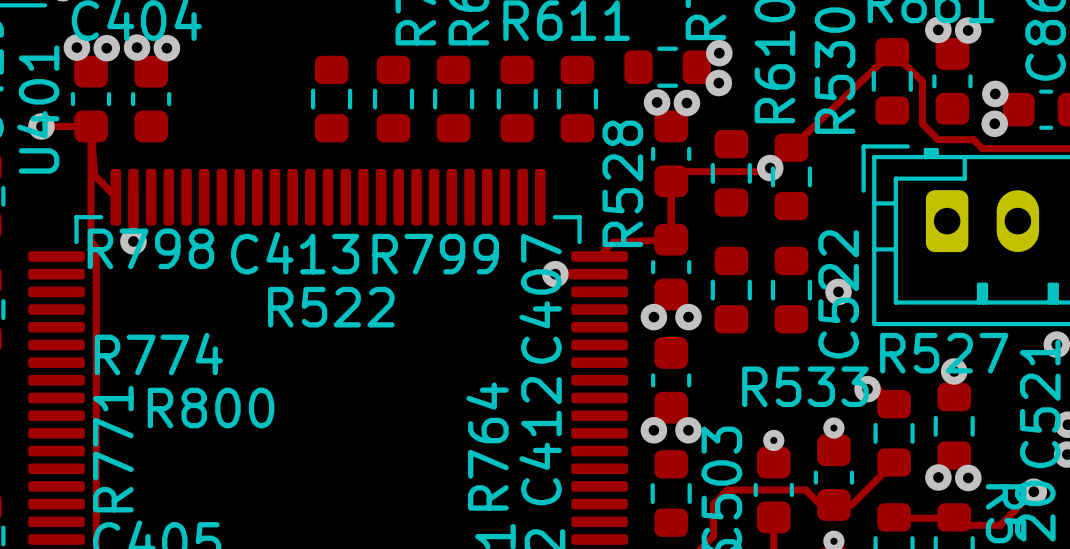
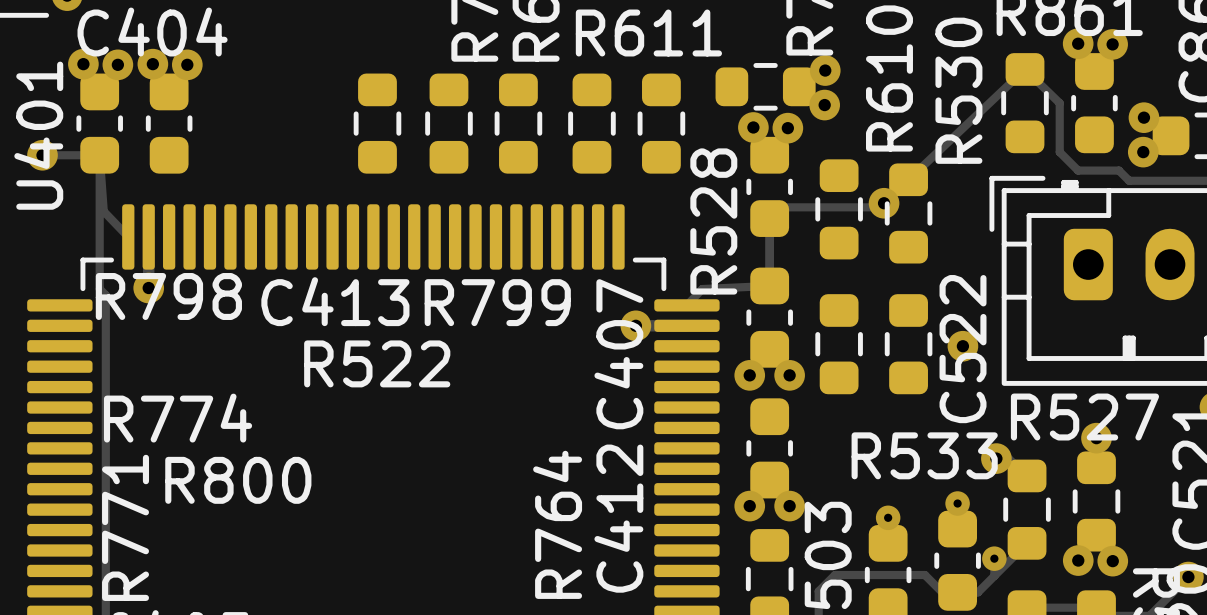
via: none -> (994, 558)

